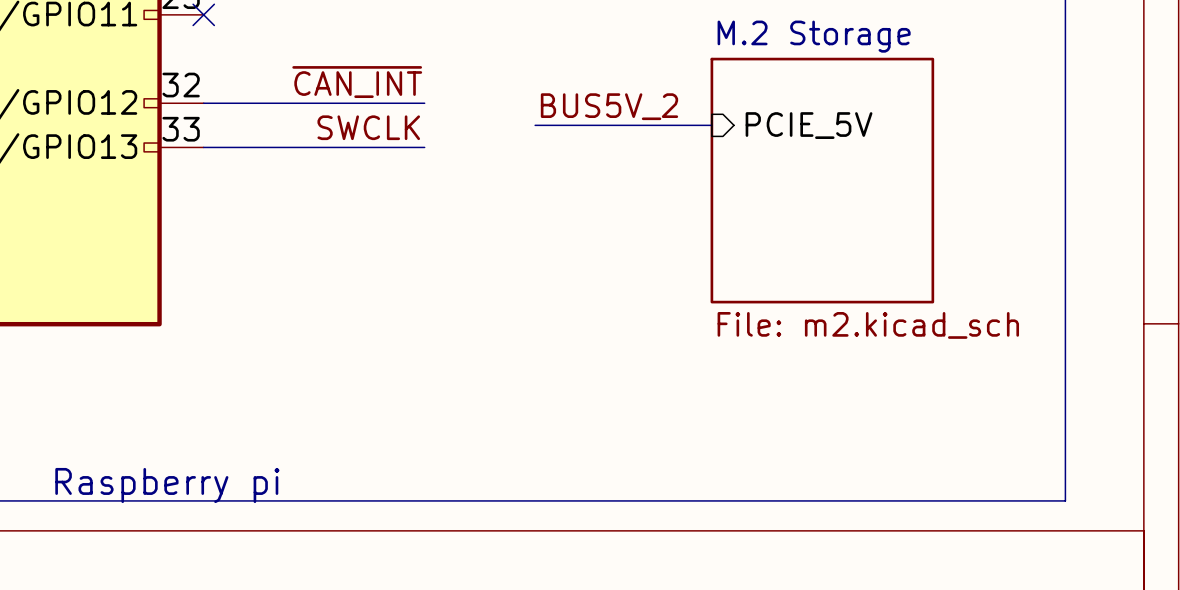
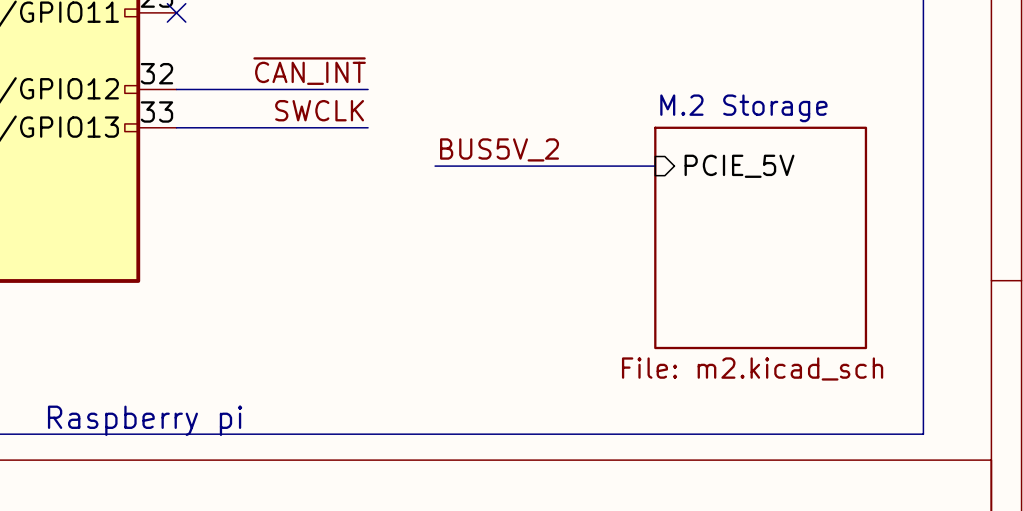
sheet M.2 Storage shape: [710, 57, 935, 304] -> [654, 126, 868, 350]
label position: BUS5V_2 (609, 106) -> BUS5V_2 (499, 149)
wire: (535, 125) (711, 125) -> none
sheet pin position: PCIE_5V (809, 125) -> PCIE_5V (739, 166)
wire: none -> (435, 166) (655, 166)
sheet M.2 Storage value position: File: m2.kicad_sch (868, 325) -> File: m2.kicad_sch (752, 368)

